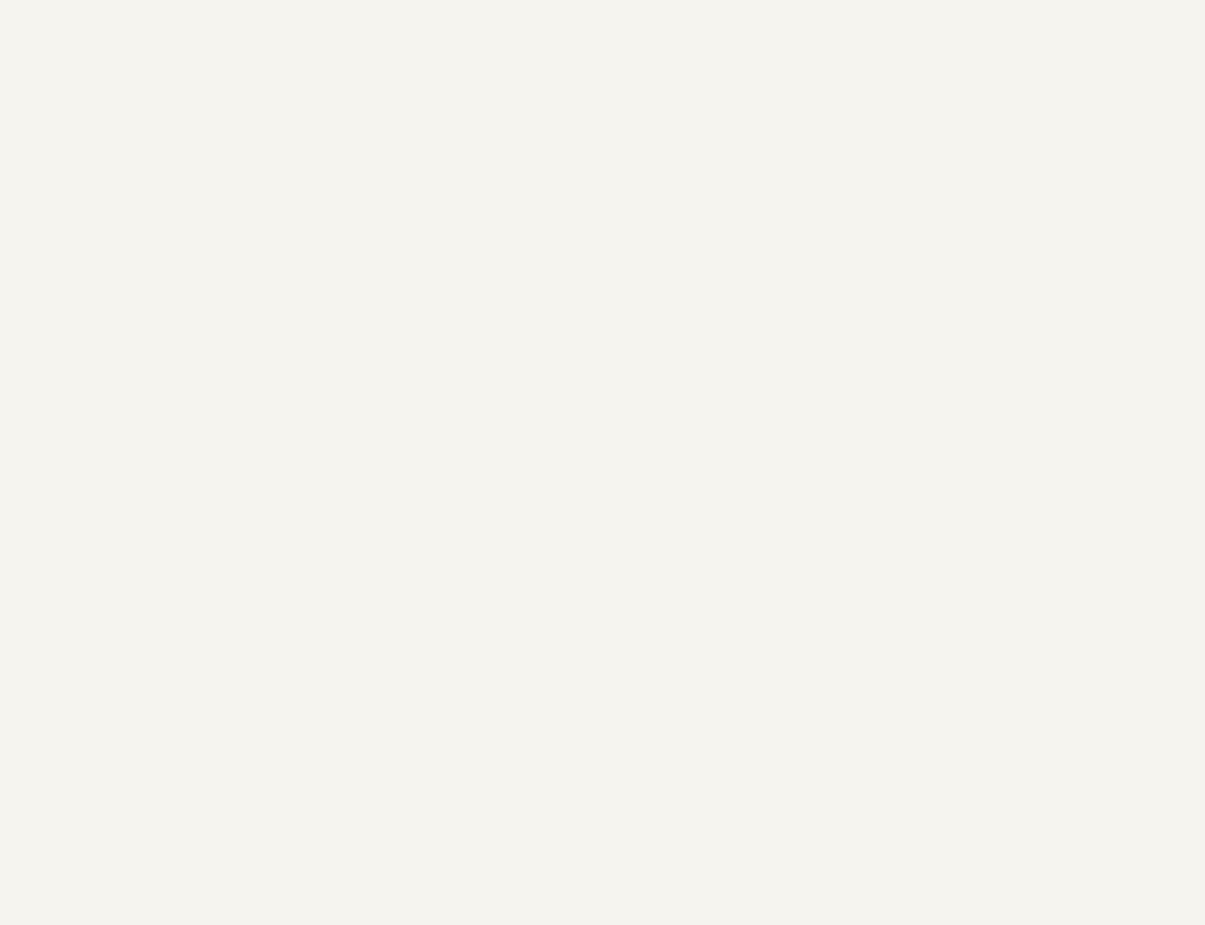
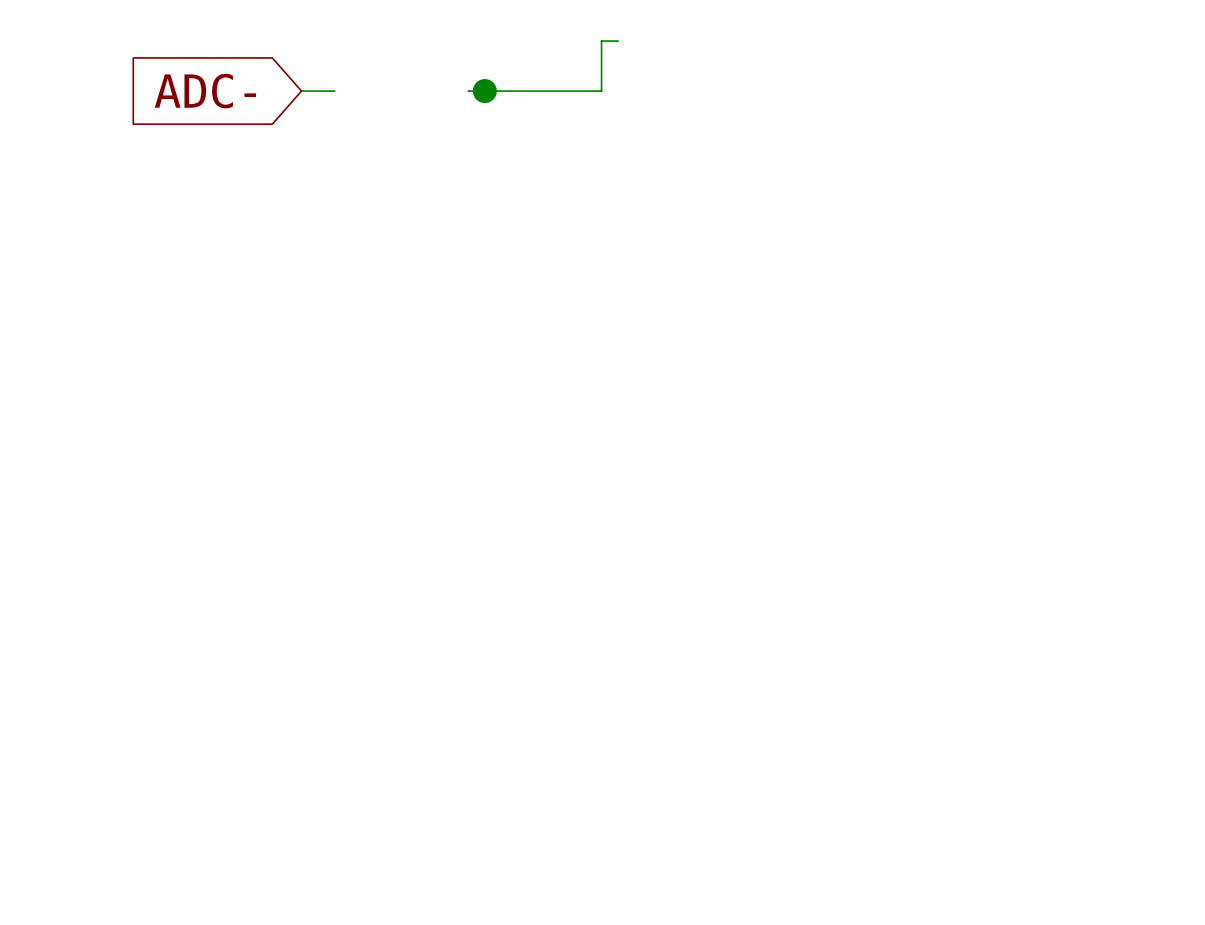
wire: none -> (618, 41) (601, 41) (601, 91) (468, 91)
global label: none -> ADC- (205, 91)
wire: none -> (301, 91) (334, 91)
junction: none -> (484, 91)

